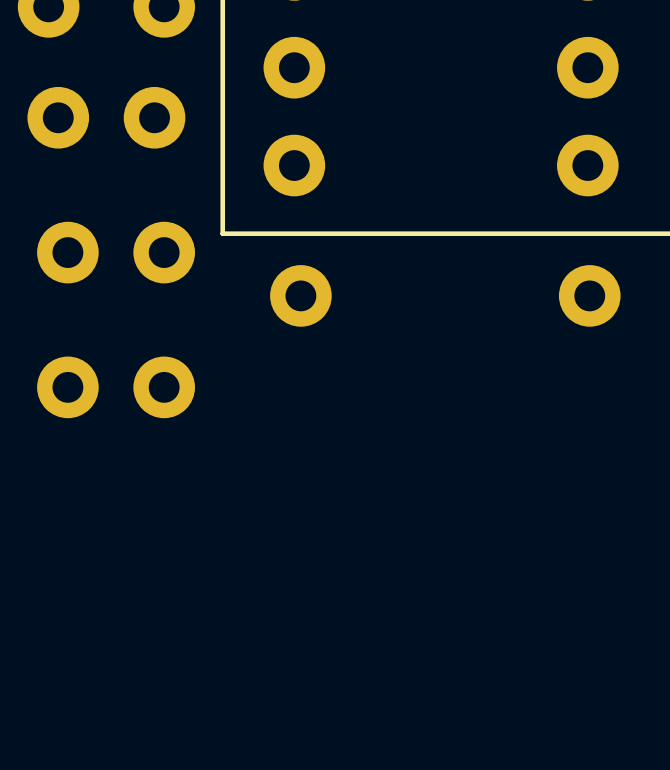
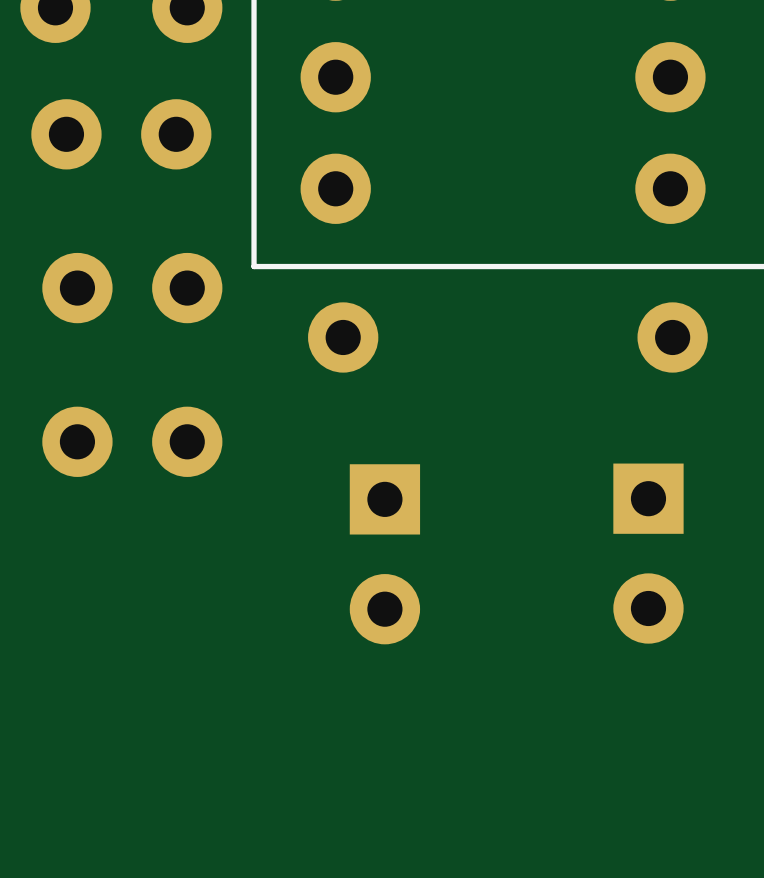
part: none -> (384, 554)
part: none -> (648, 553)

